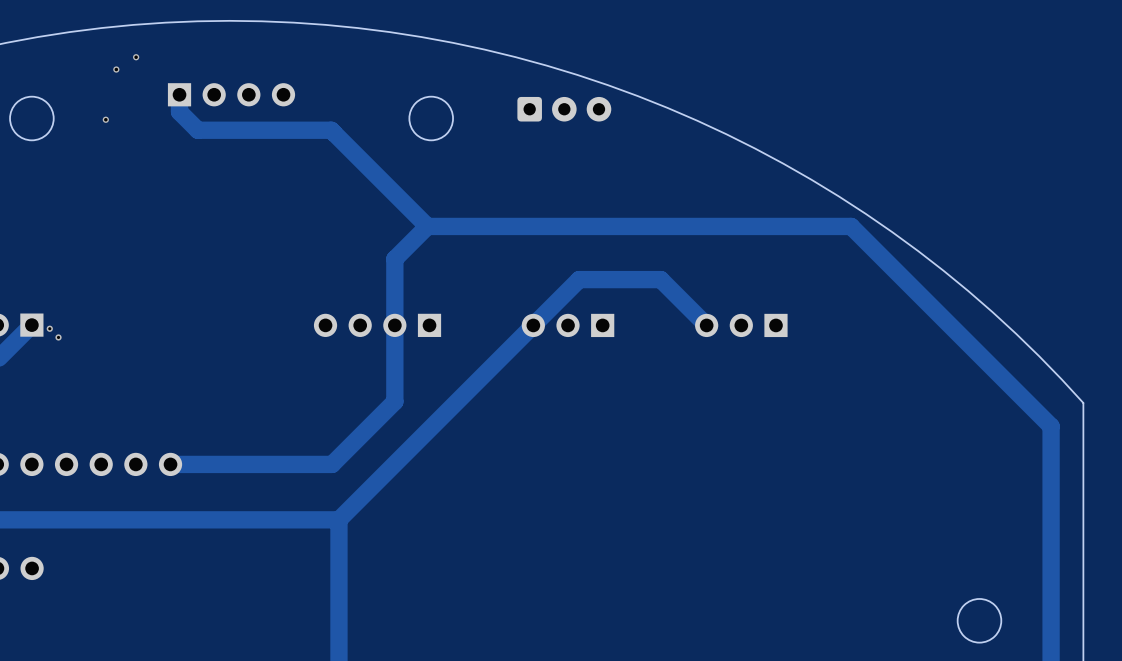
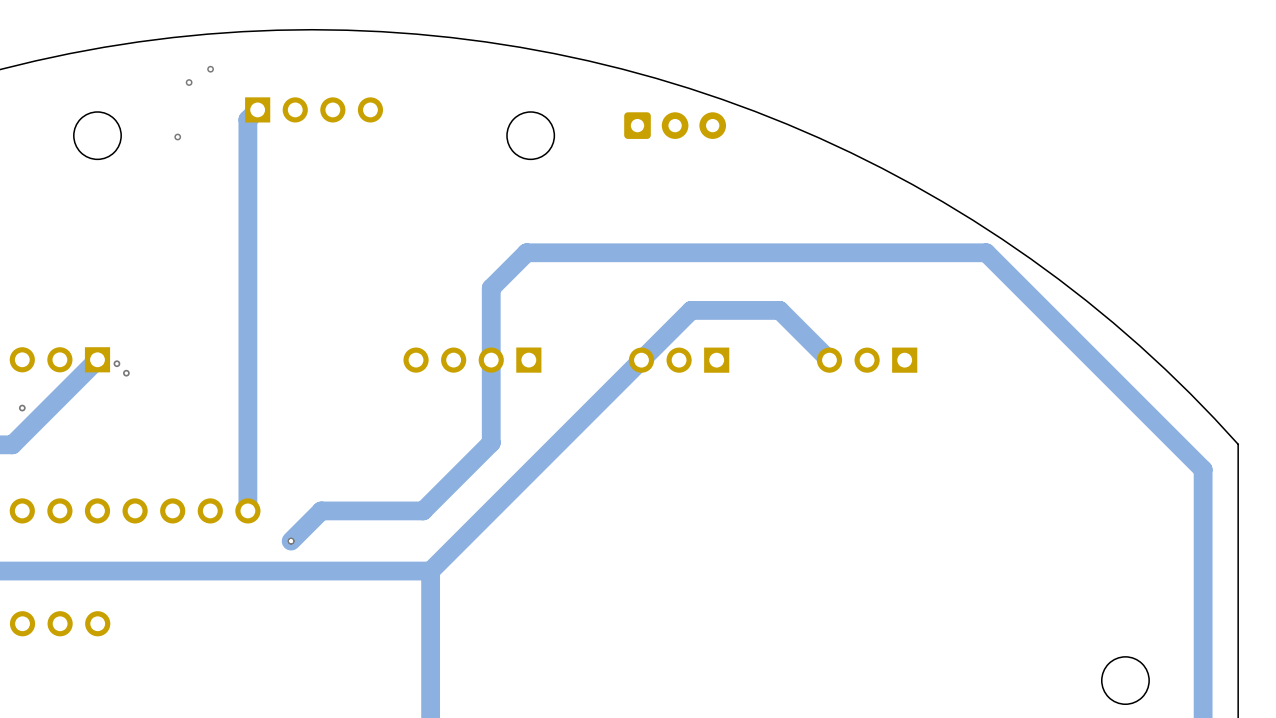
track: (179, 94) (179, 111) (197, 130) (331, 130) (427, 226) -> (257, 109) (247, 119) (247, 510)
track: (238, 464) (170, 464) -> (321, 510) (291, 541)
via: none -> (291, 541)

